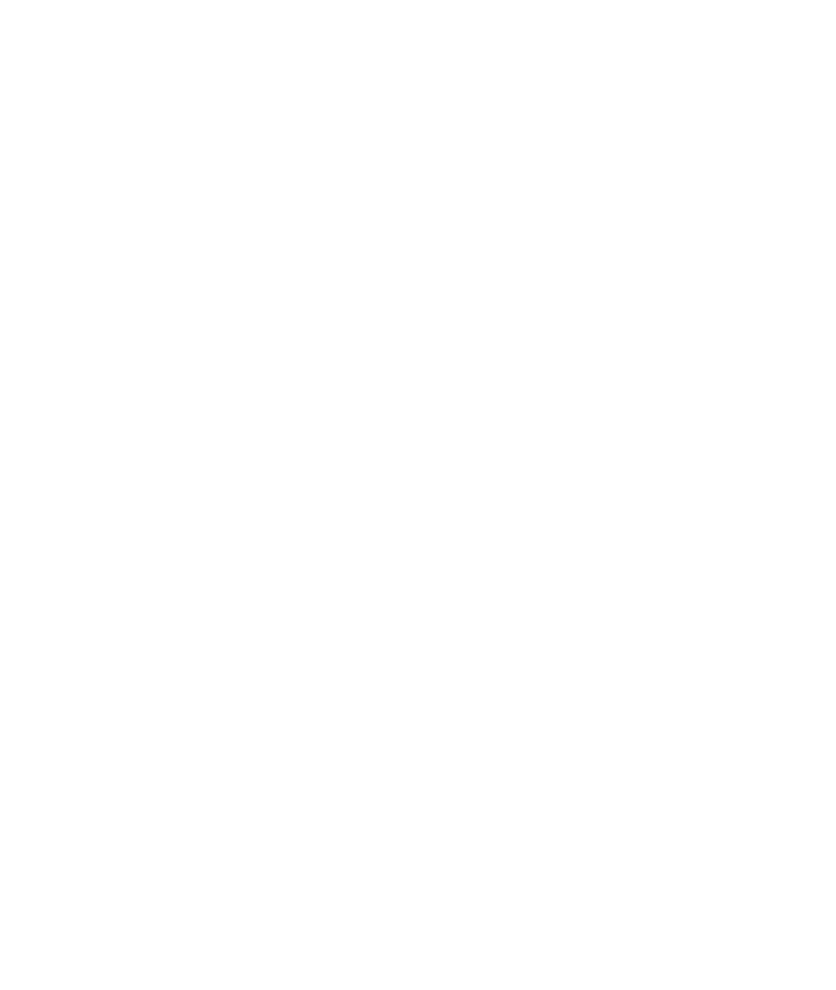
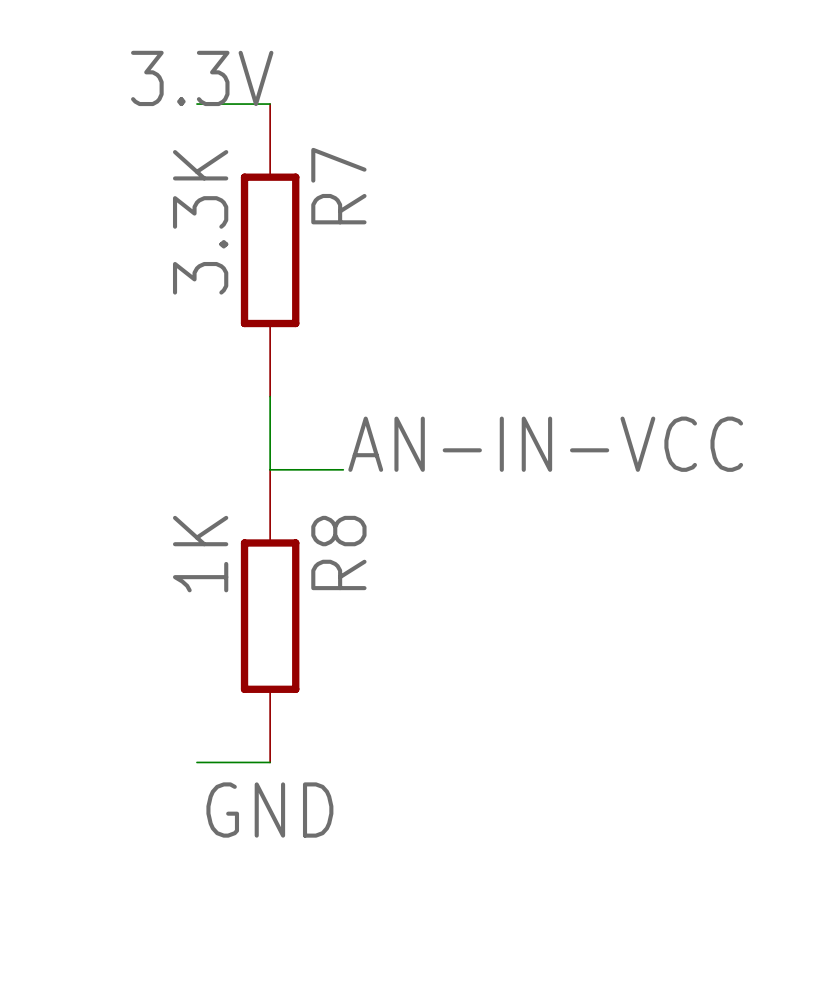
label: none -> 3.3V (202, 78)
wire: none -> (196, 104) (270, 104)
R7: none -> 3.3K (270, 250)
wire: none -> (270, 396) (270, 469) (343, 469)
label: none -> AN-IN-VCC (545, 444)
R8: none -> 1K (270, 616)
wire: none -> (196, 762) (270, 762)
label: none -> GND (269, 810)

